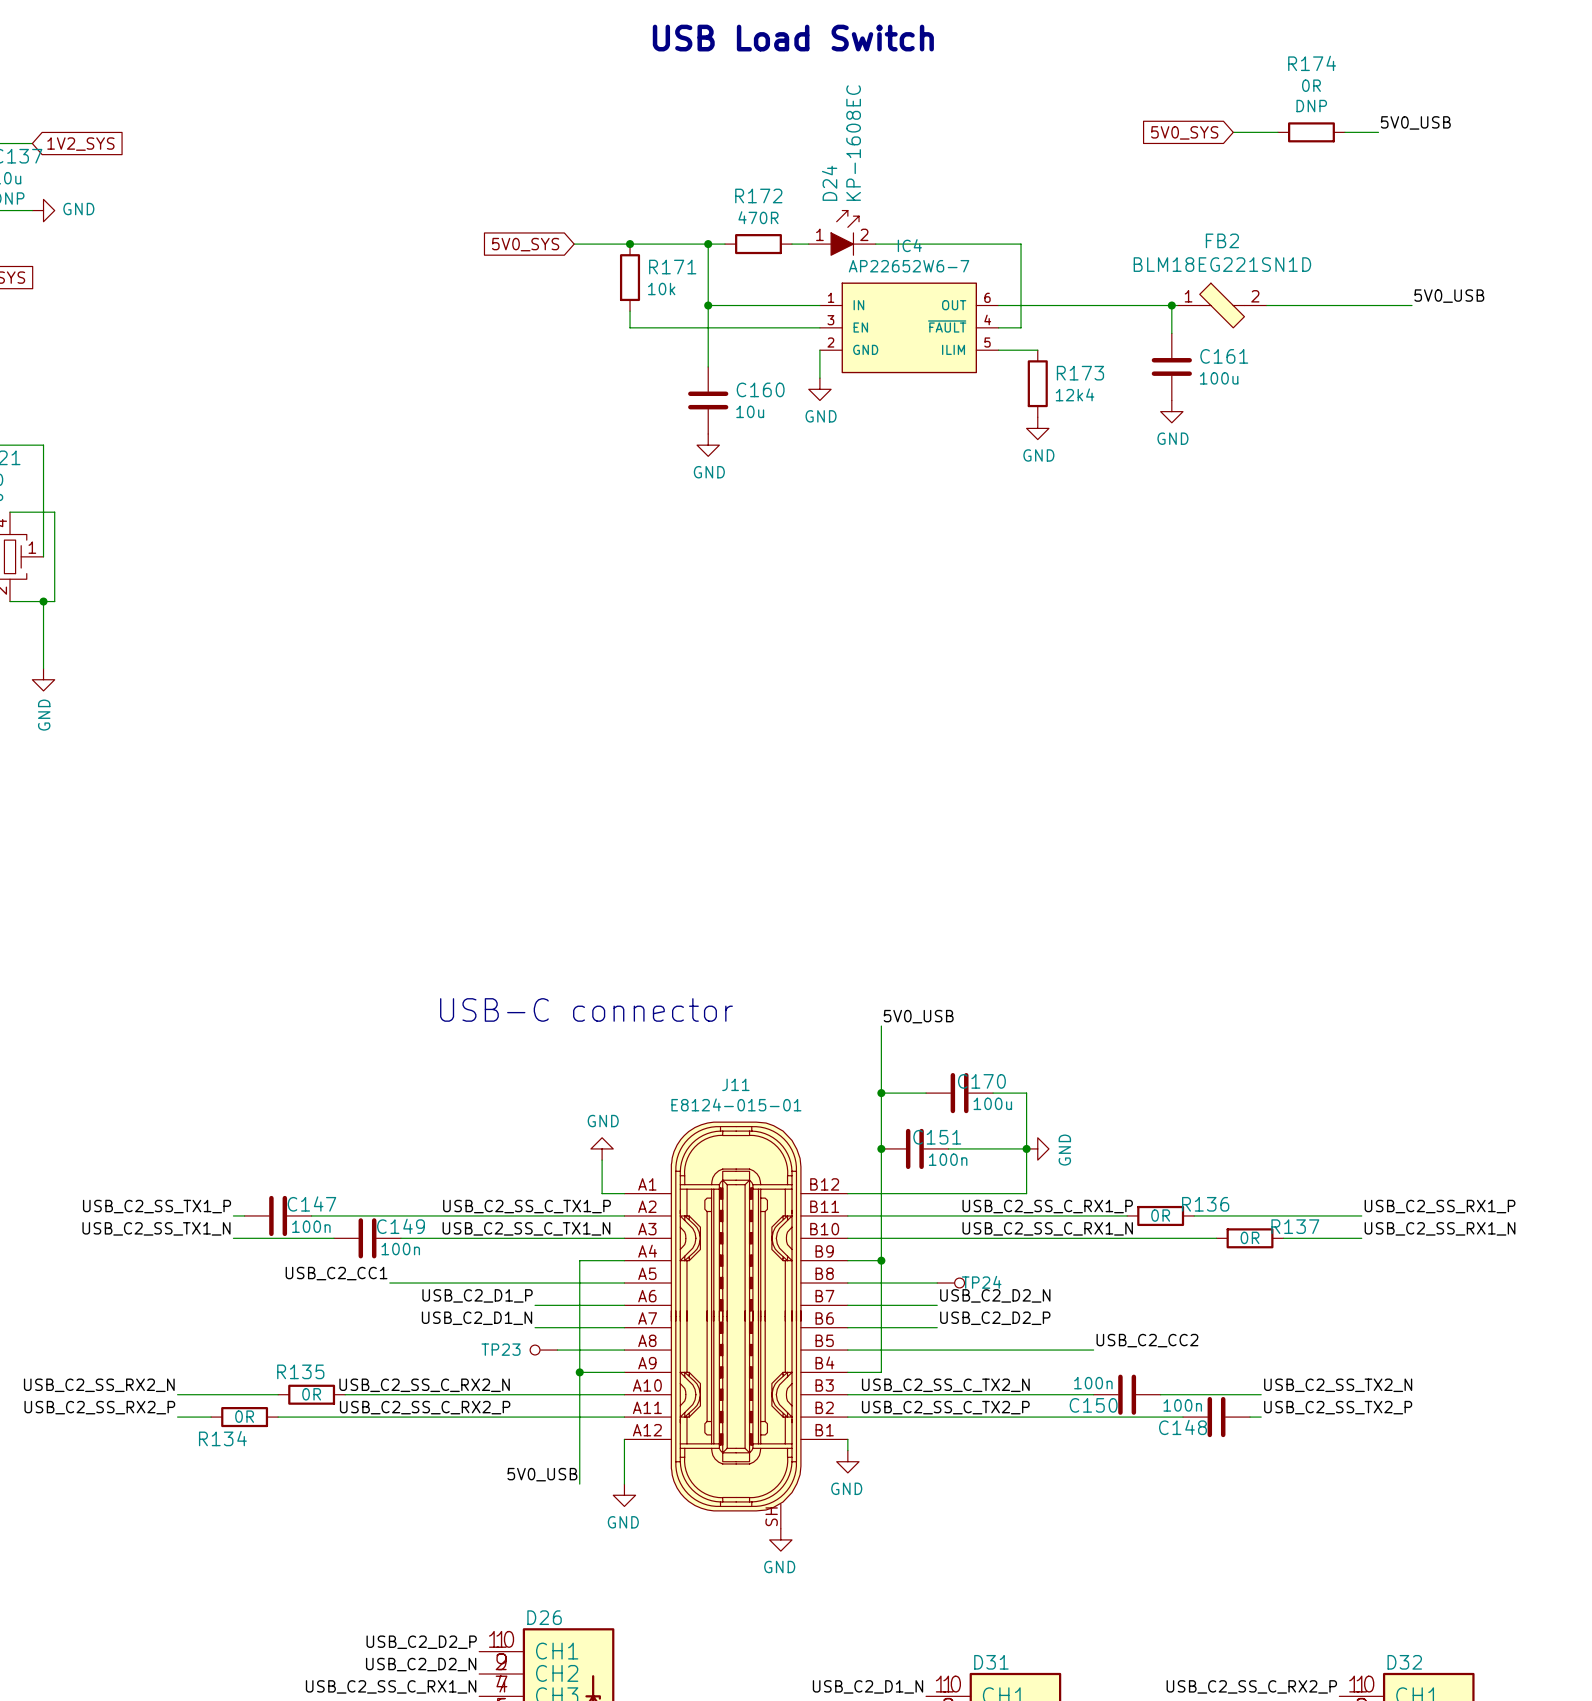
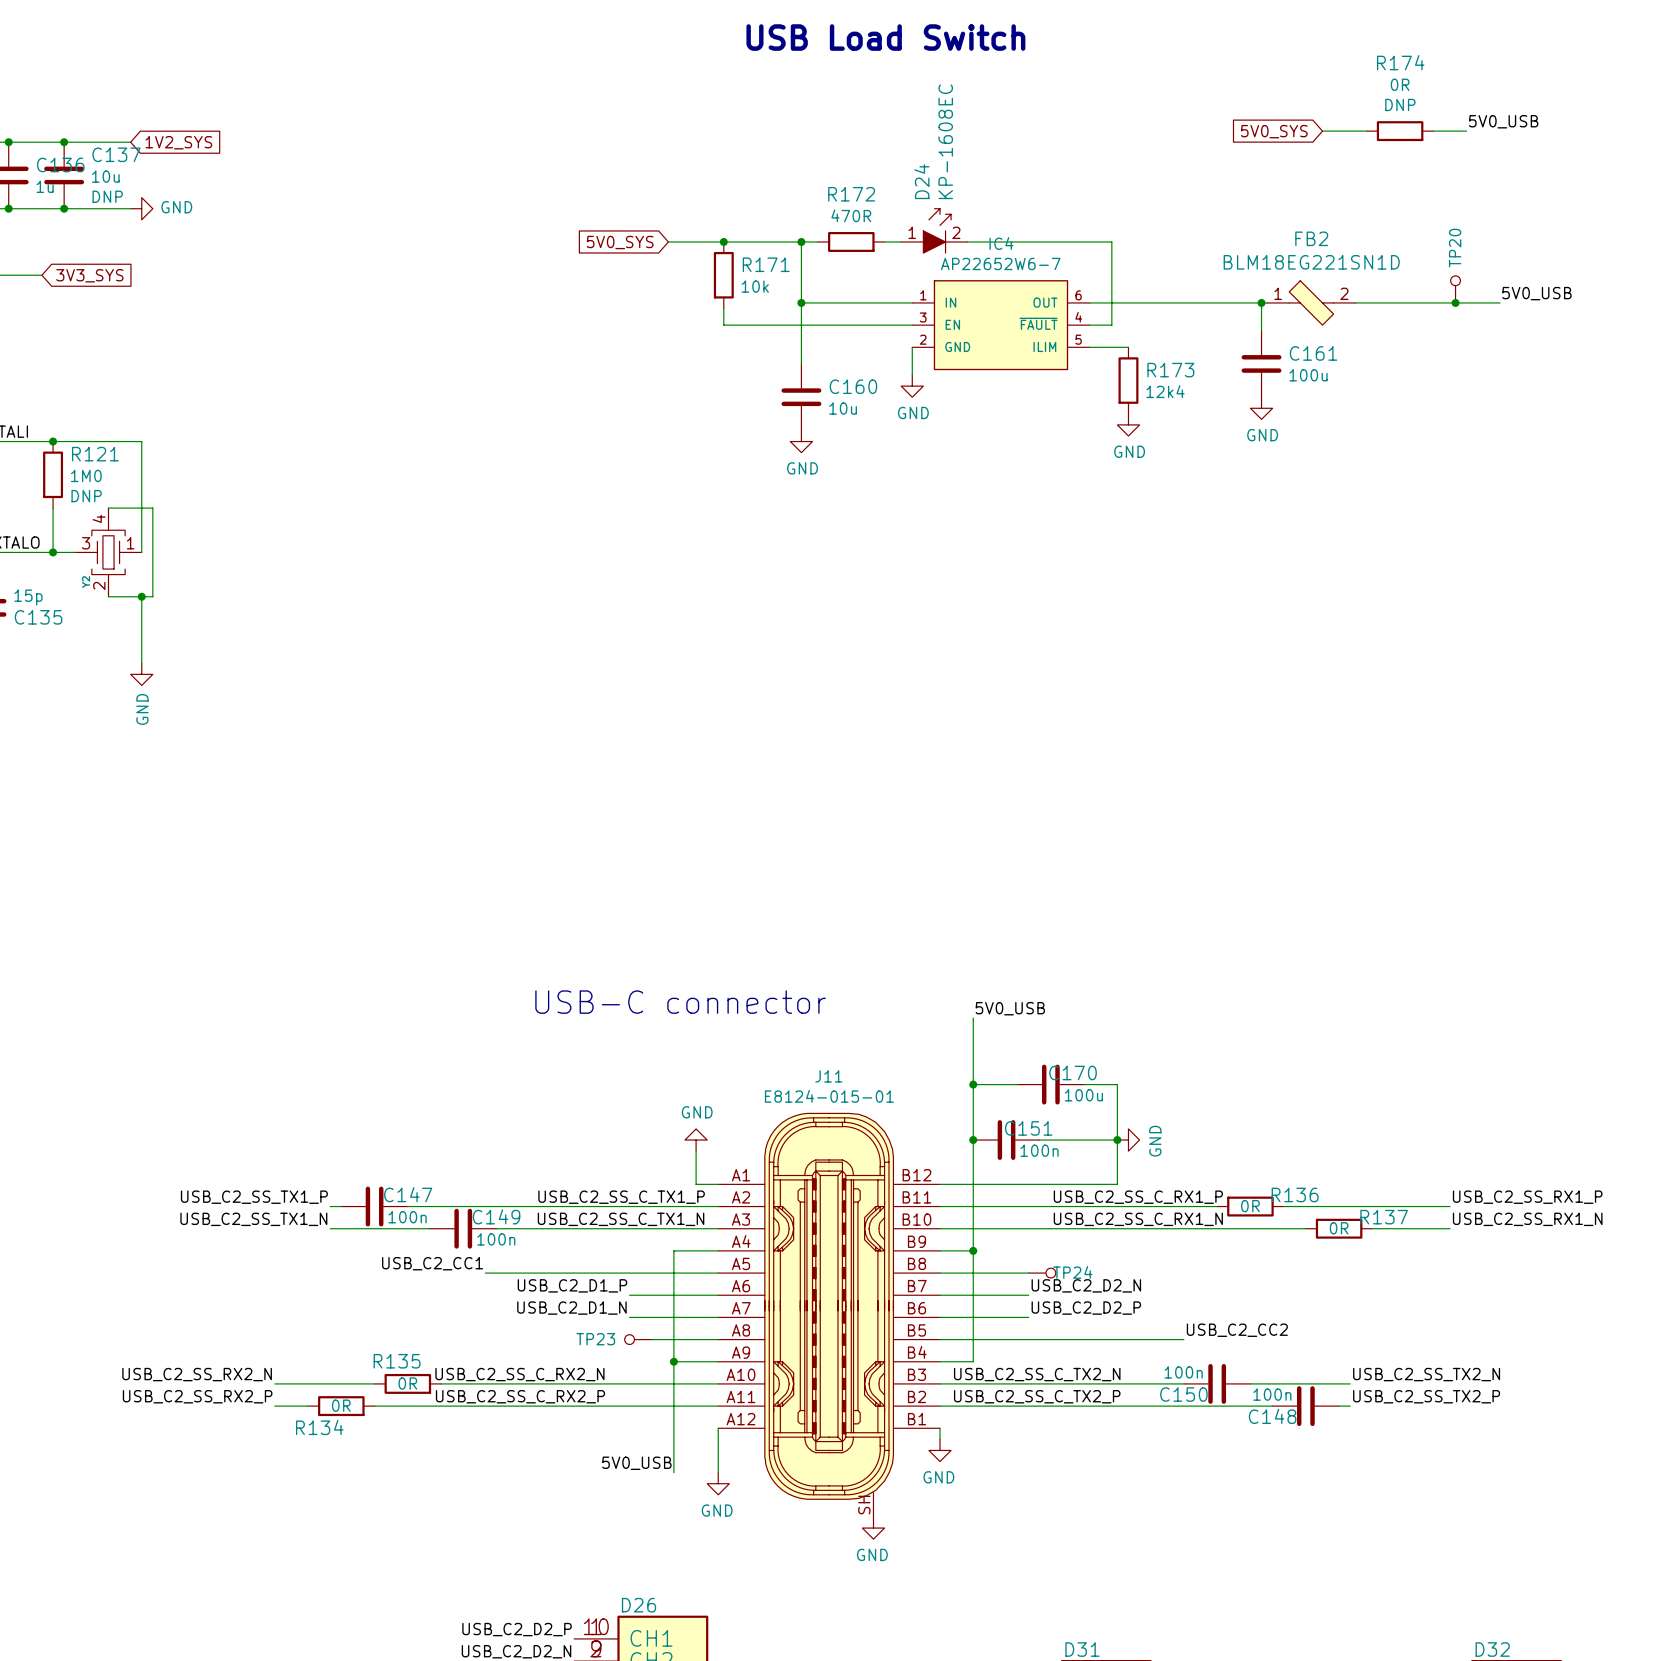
TP20: none -> (1455, 289)
junction: none -> (1455, 302)

